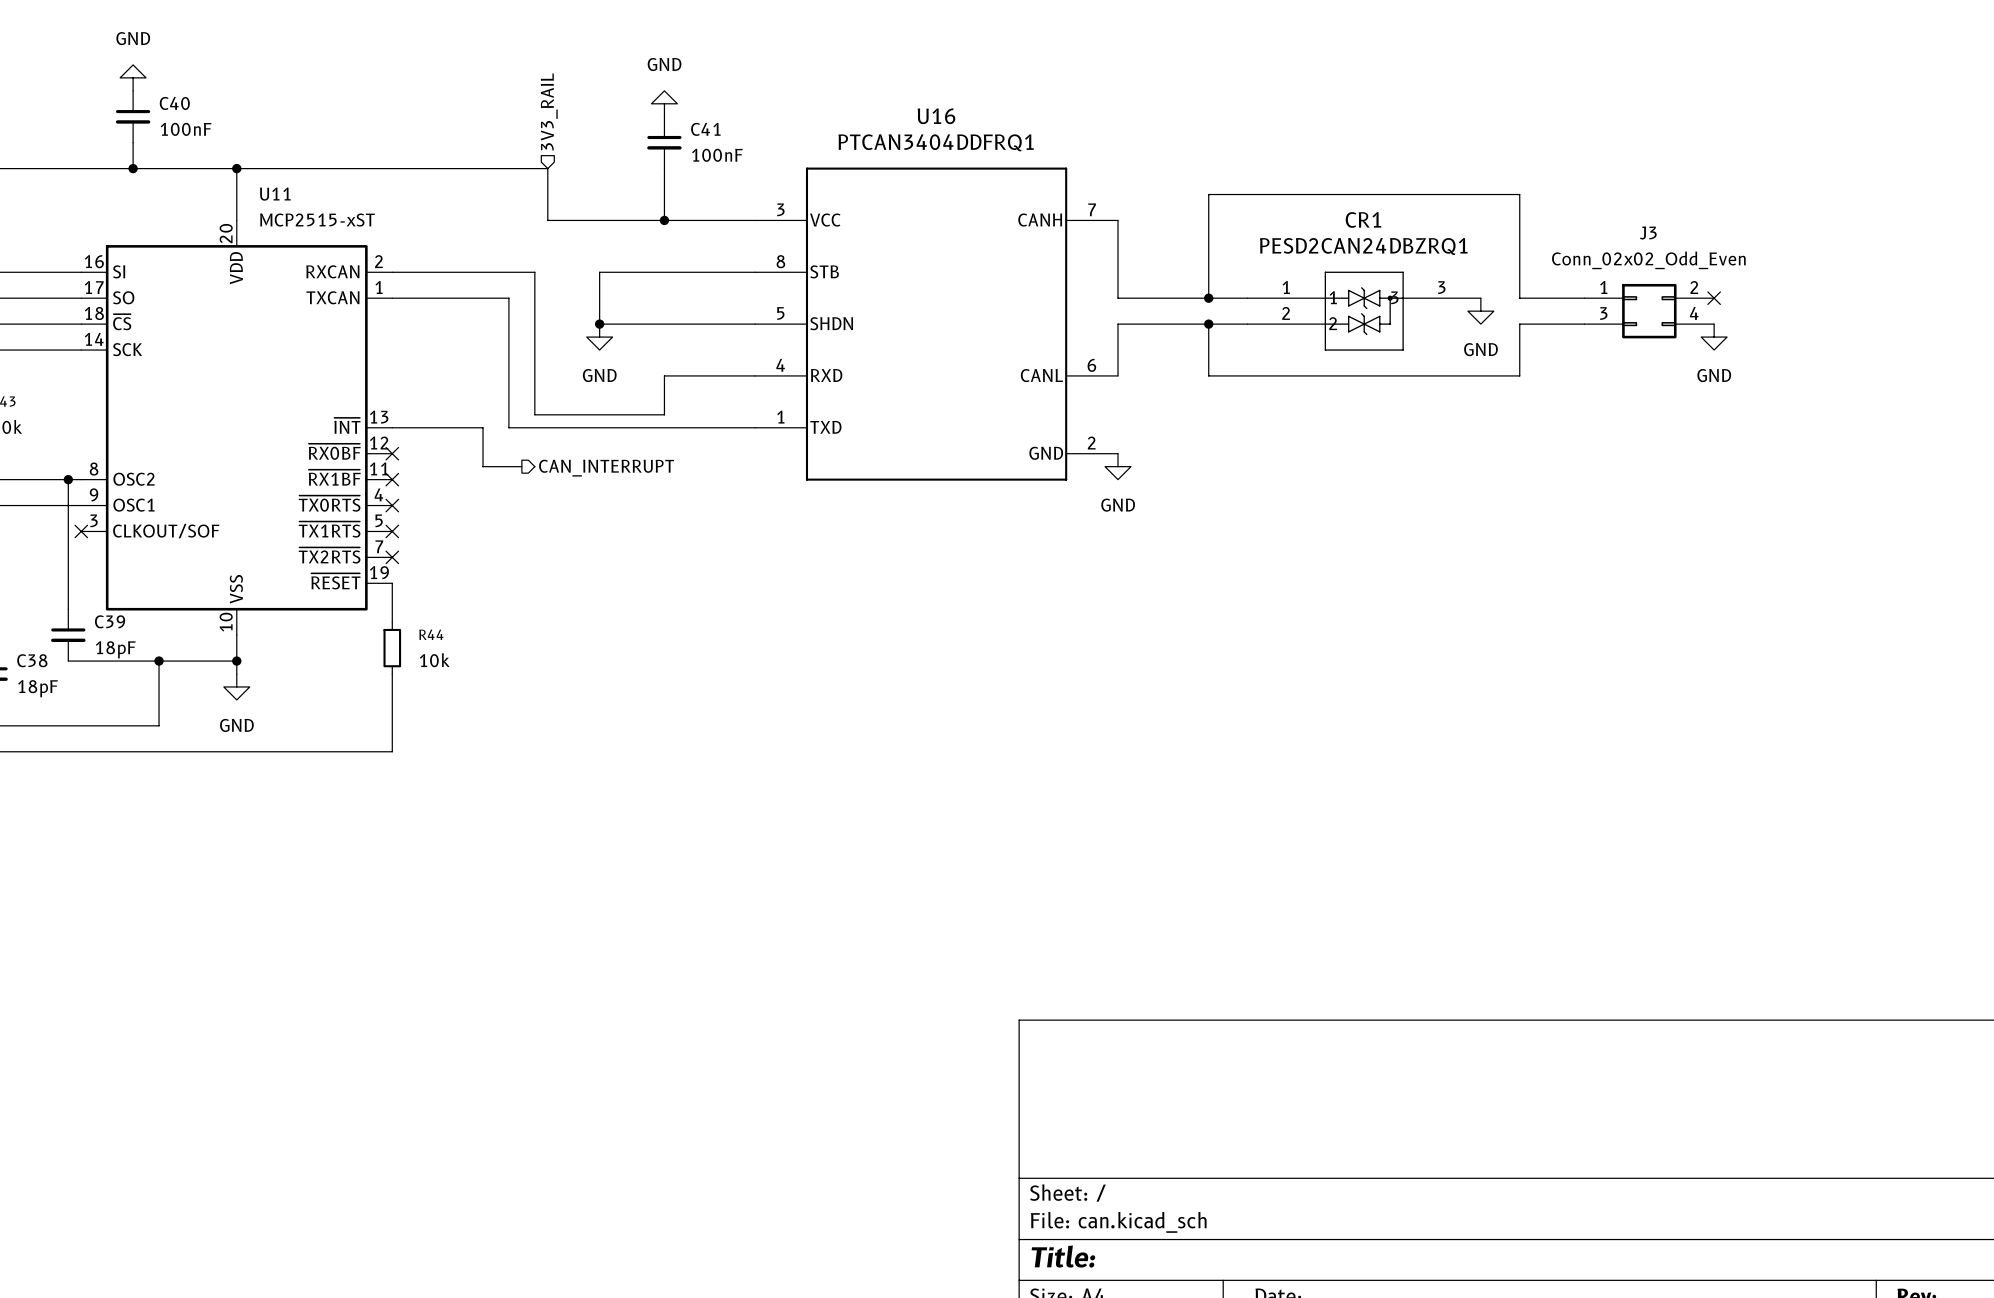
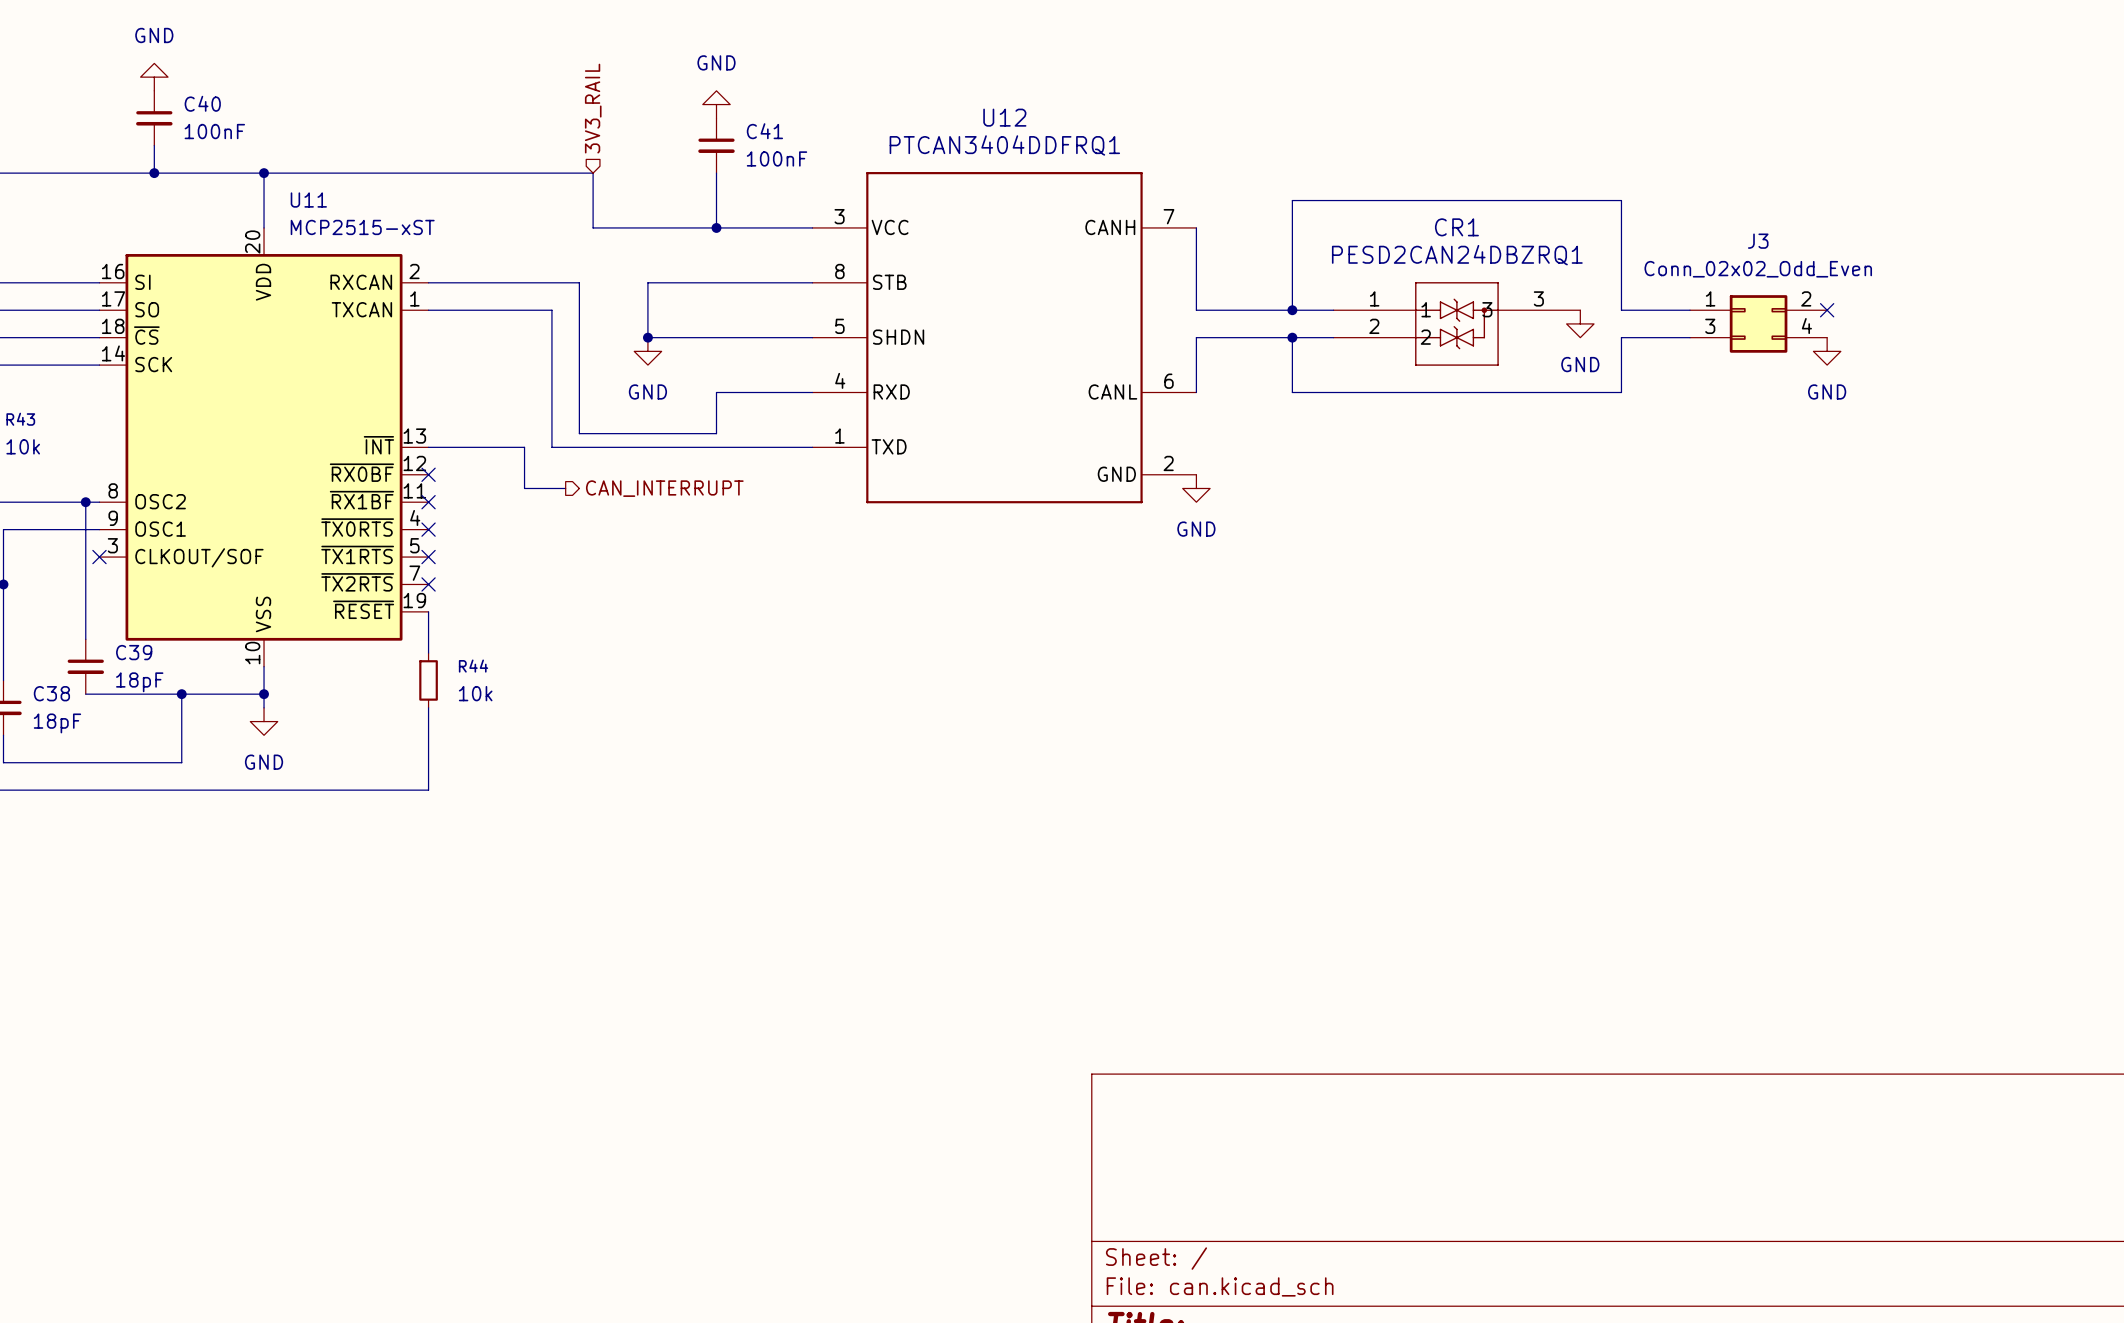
U16 name: U16 (936, 116) -> U12 (1004, 117)

